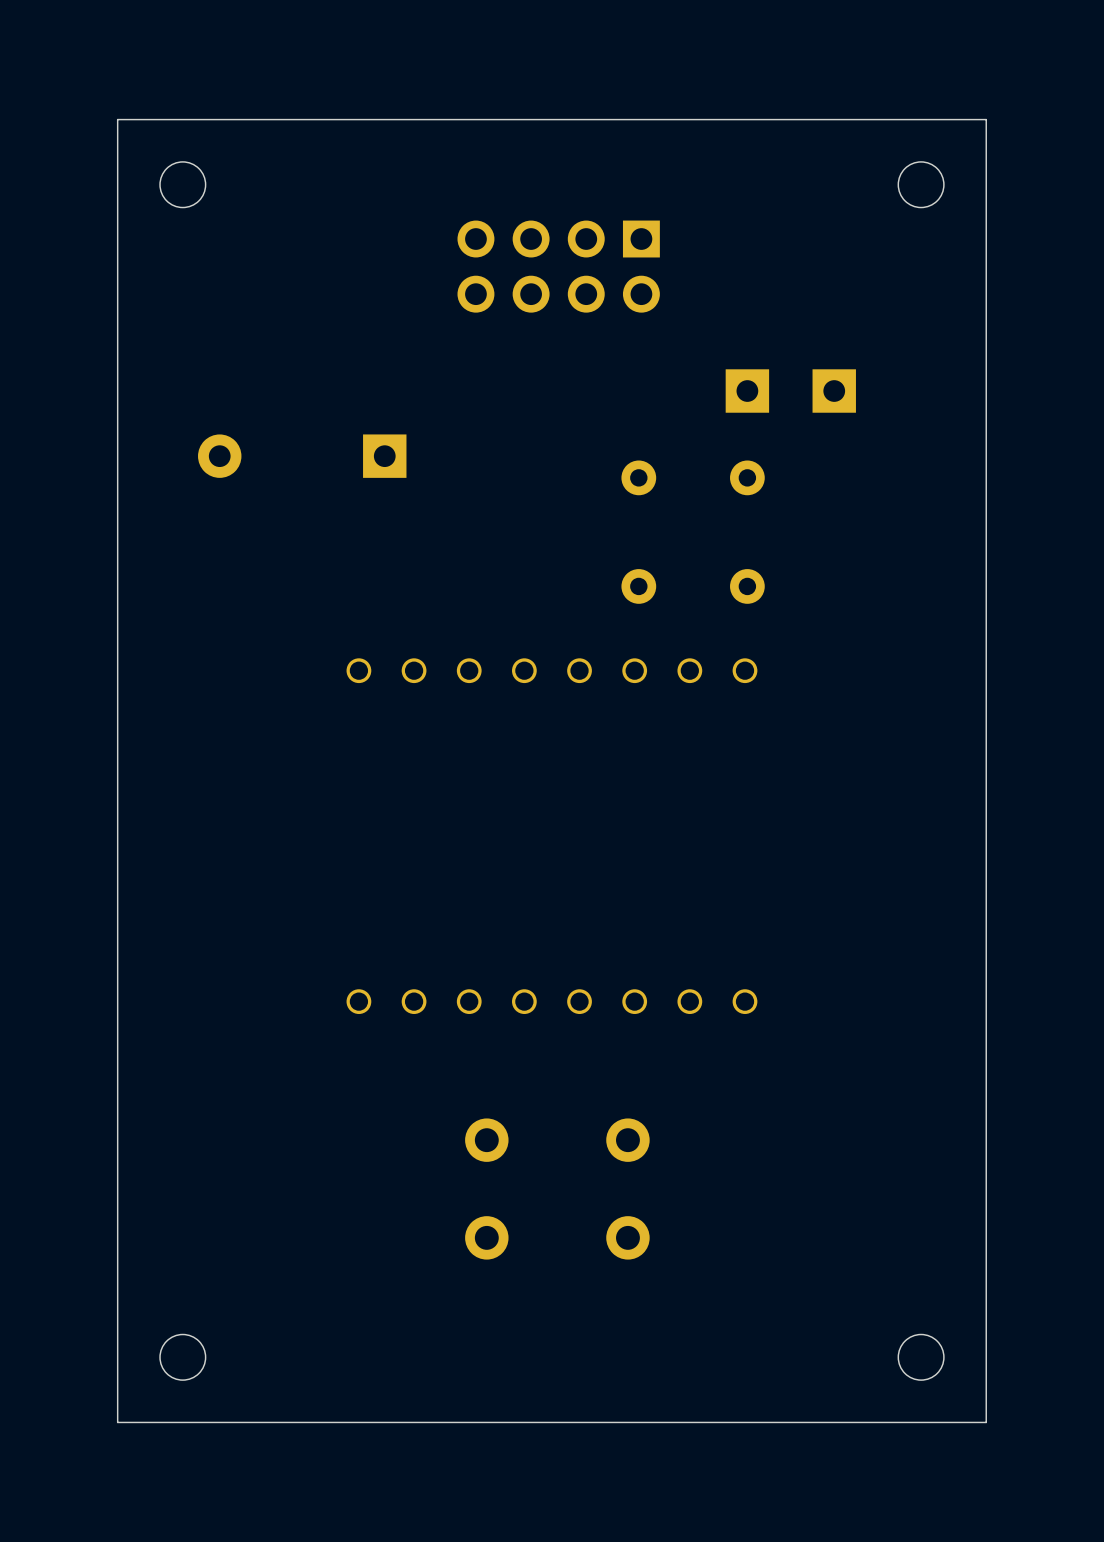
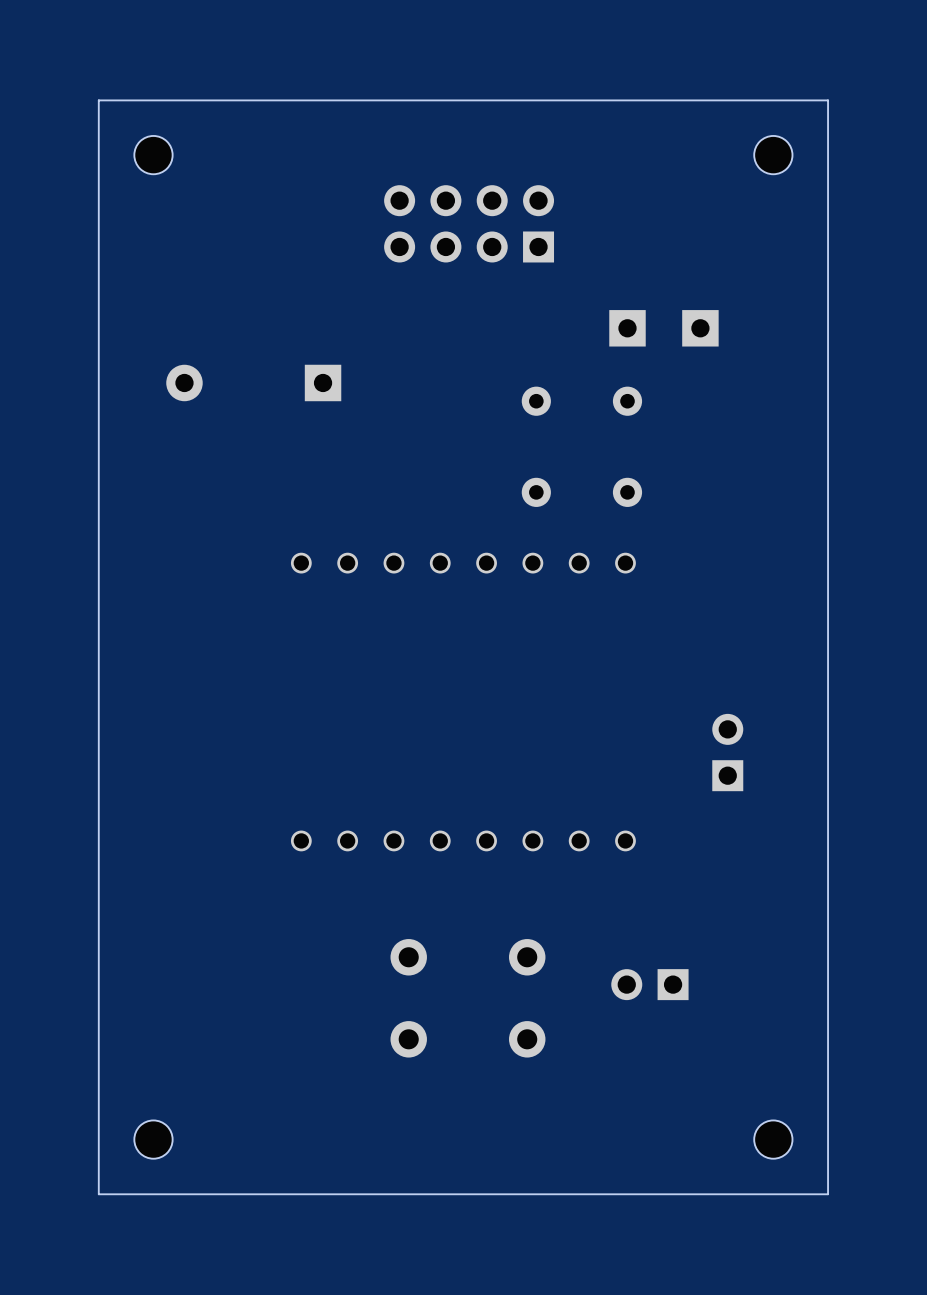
part footprint: [457, 220, 660, 313] -> [384, 185, 555, 263]
part: none -> (727, 752)
part: none -> (649, 984)

